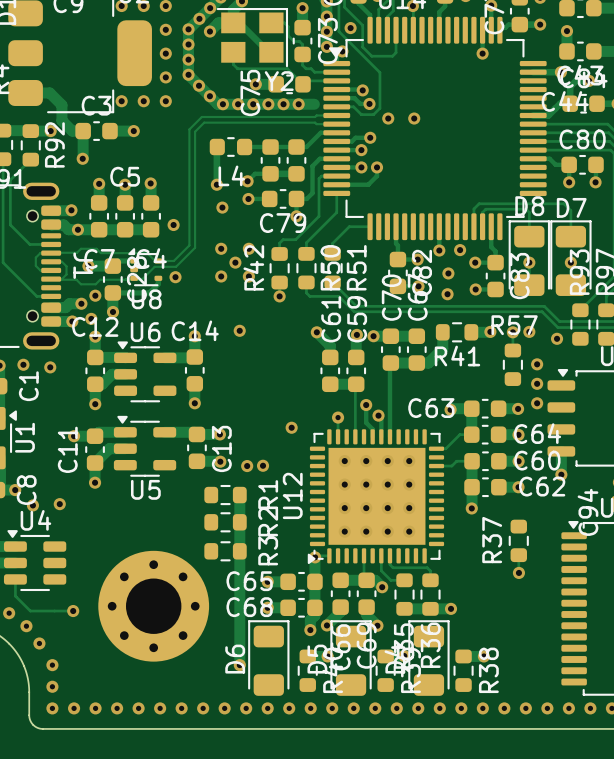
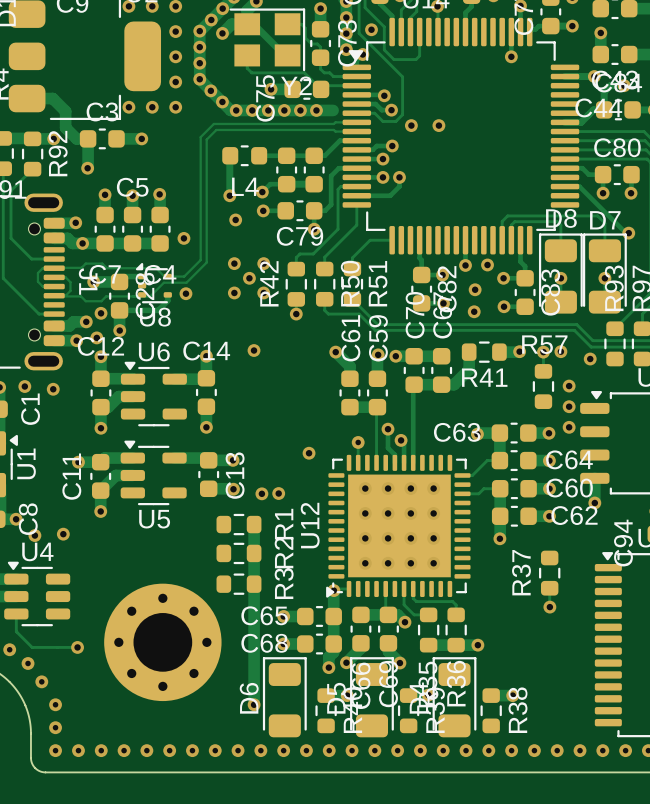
track: none -> (565, 186) (579, 186) (625, 233) (628, 233)
via: none -> (628, 233)

